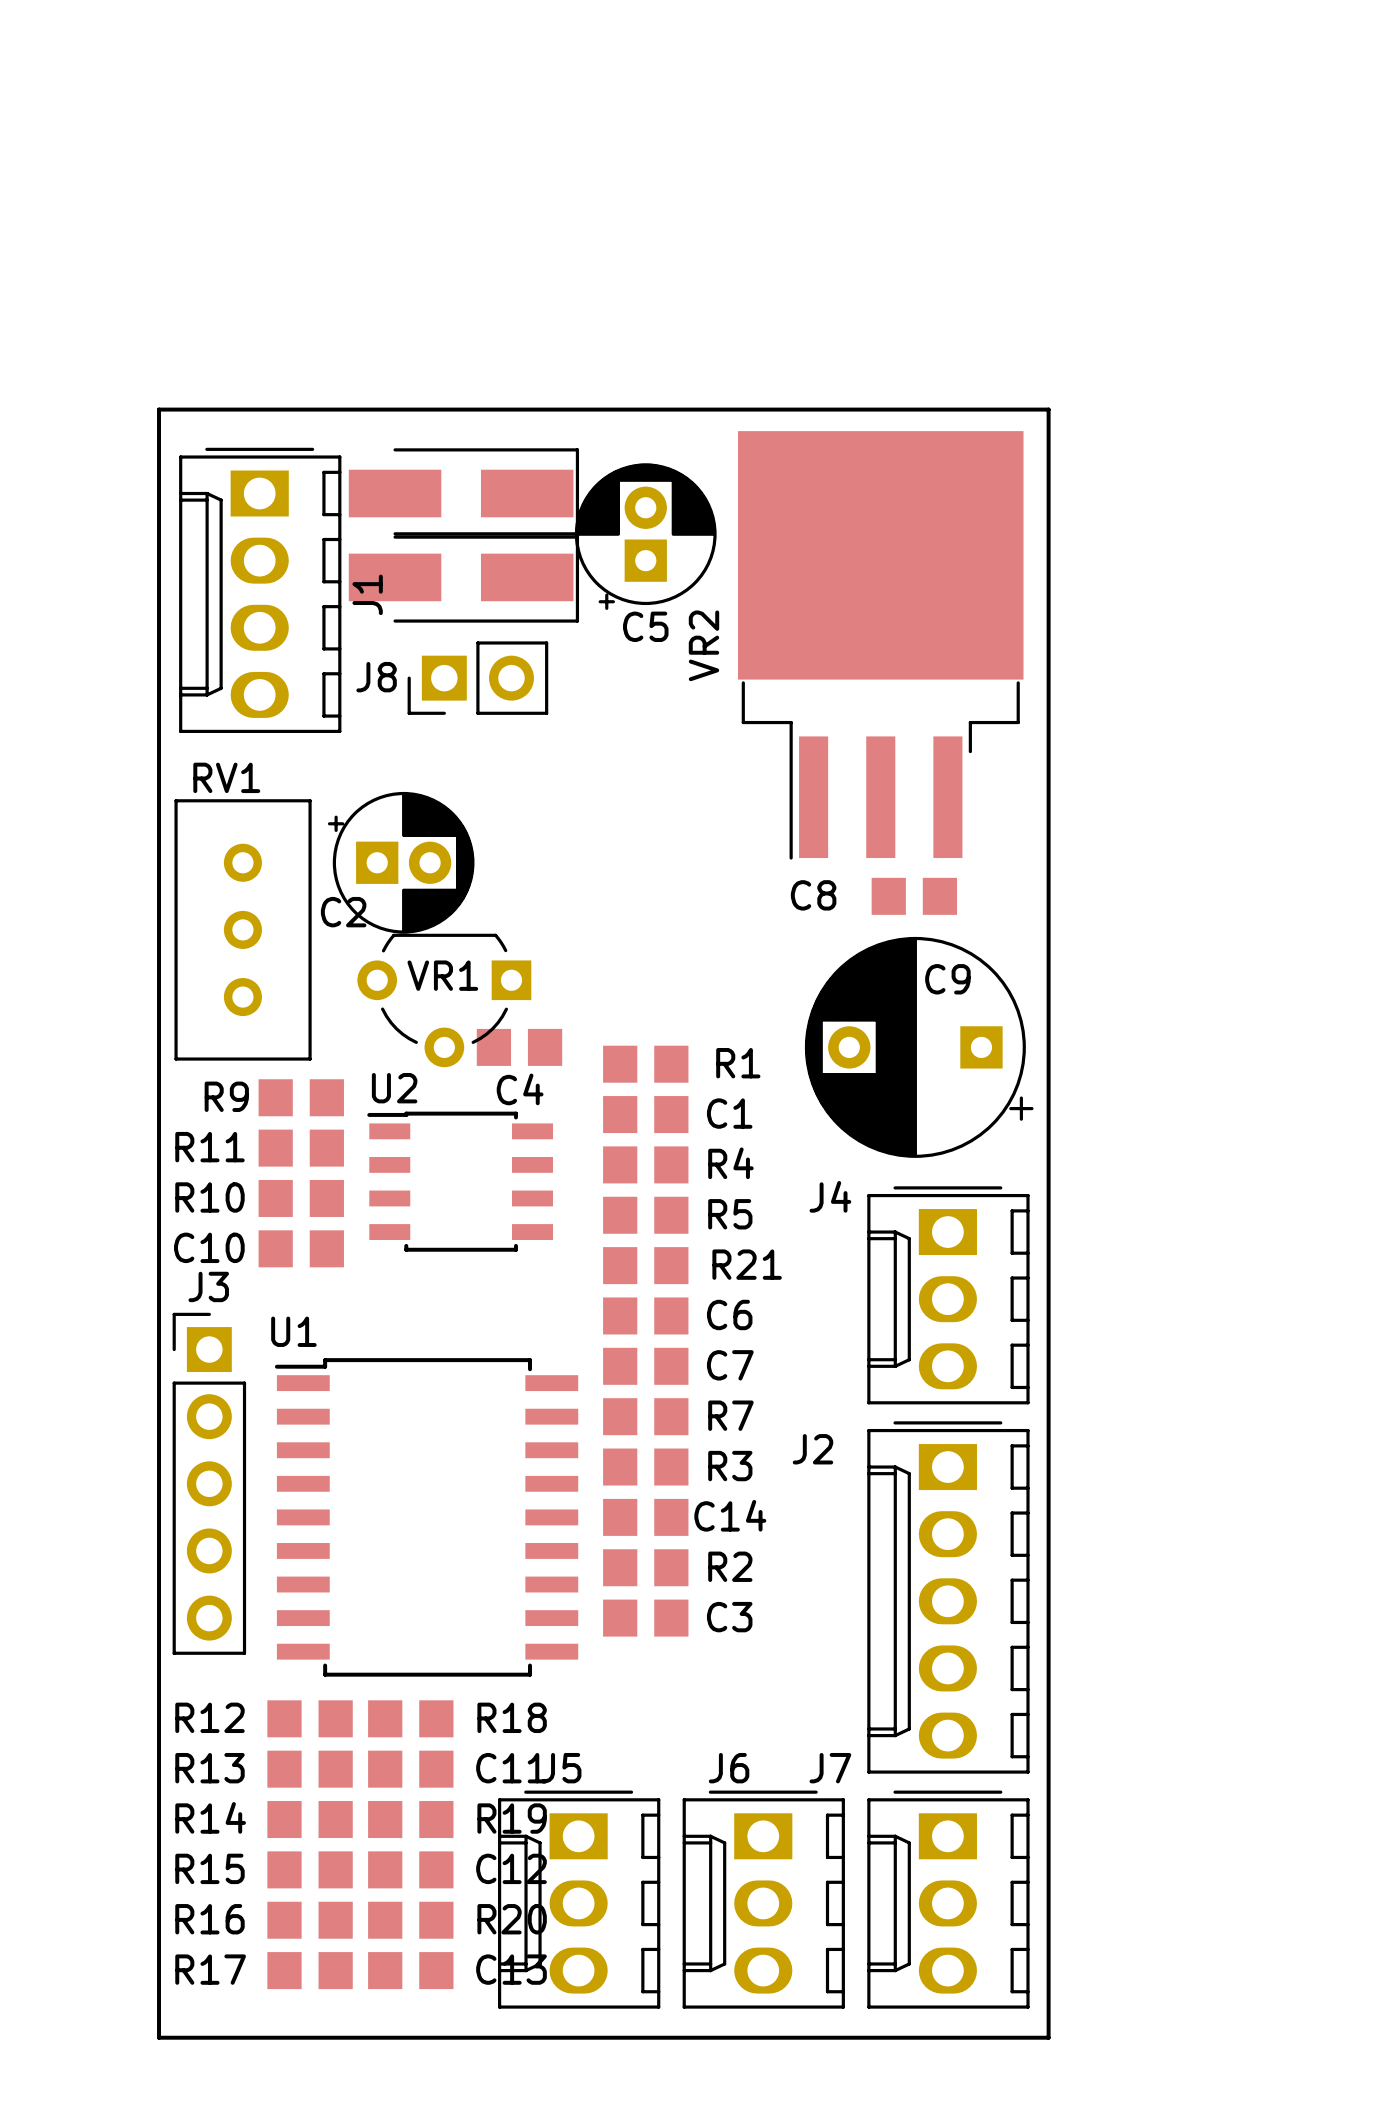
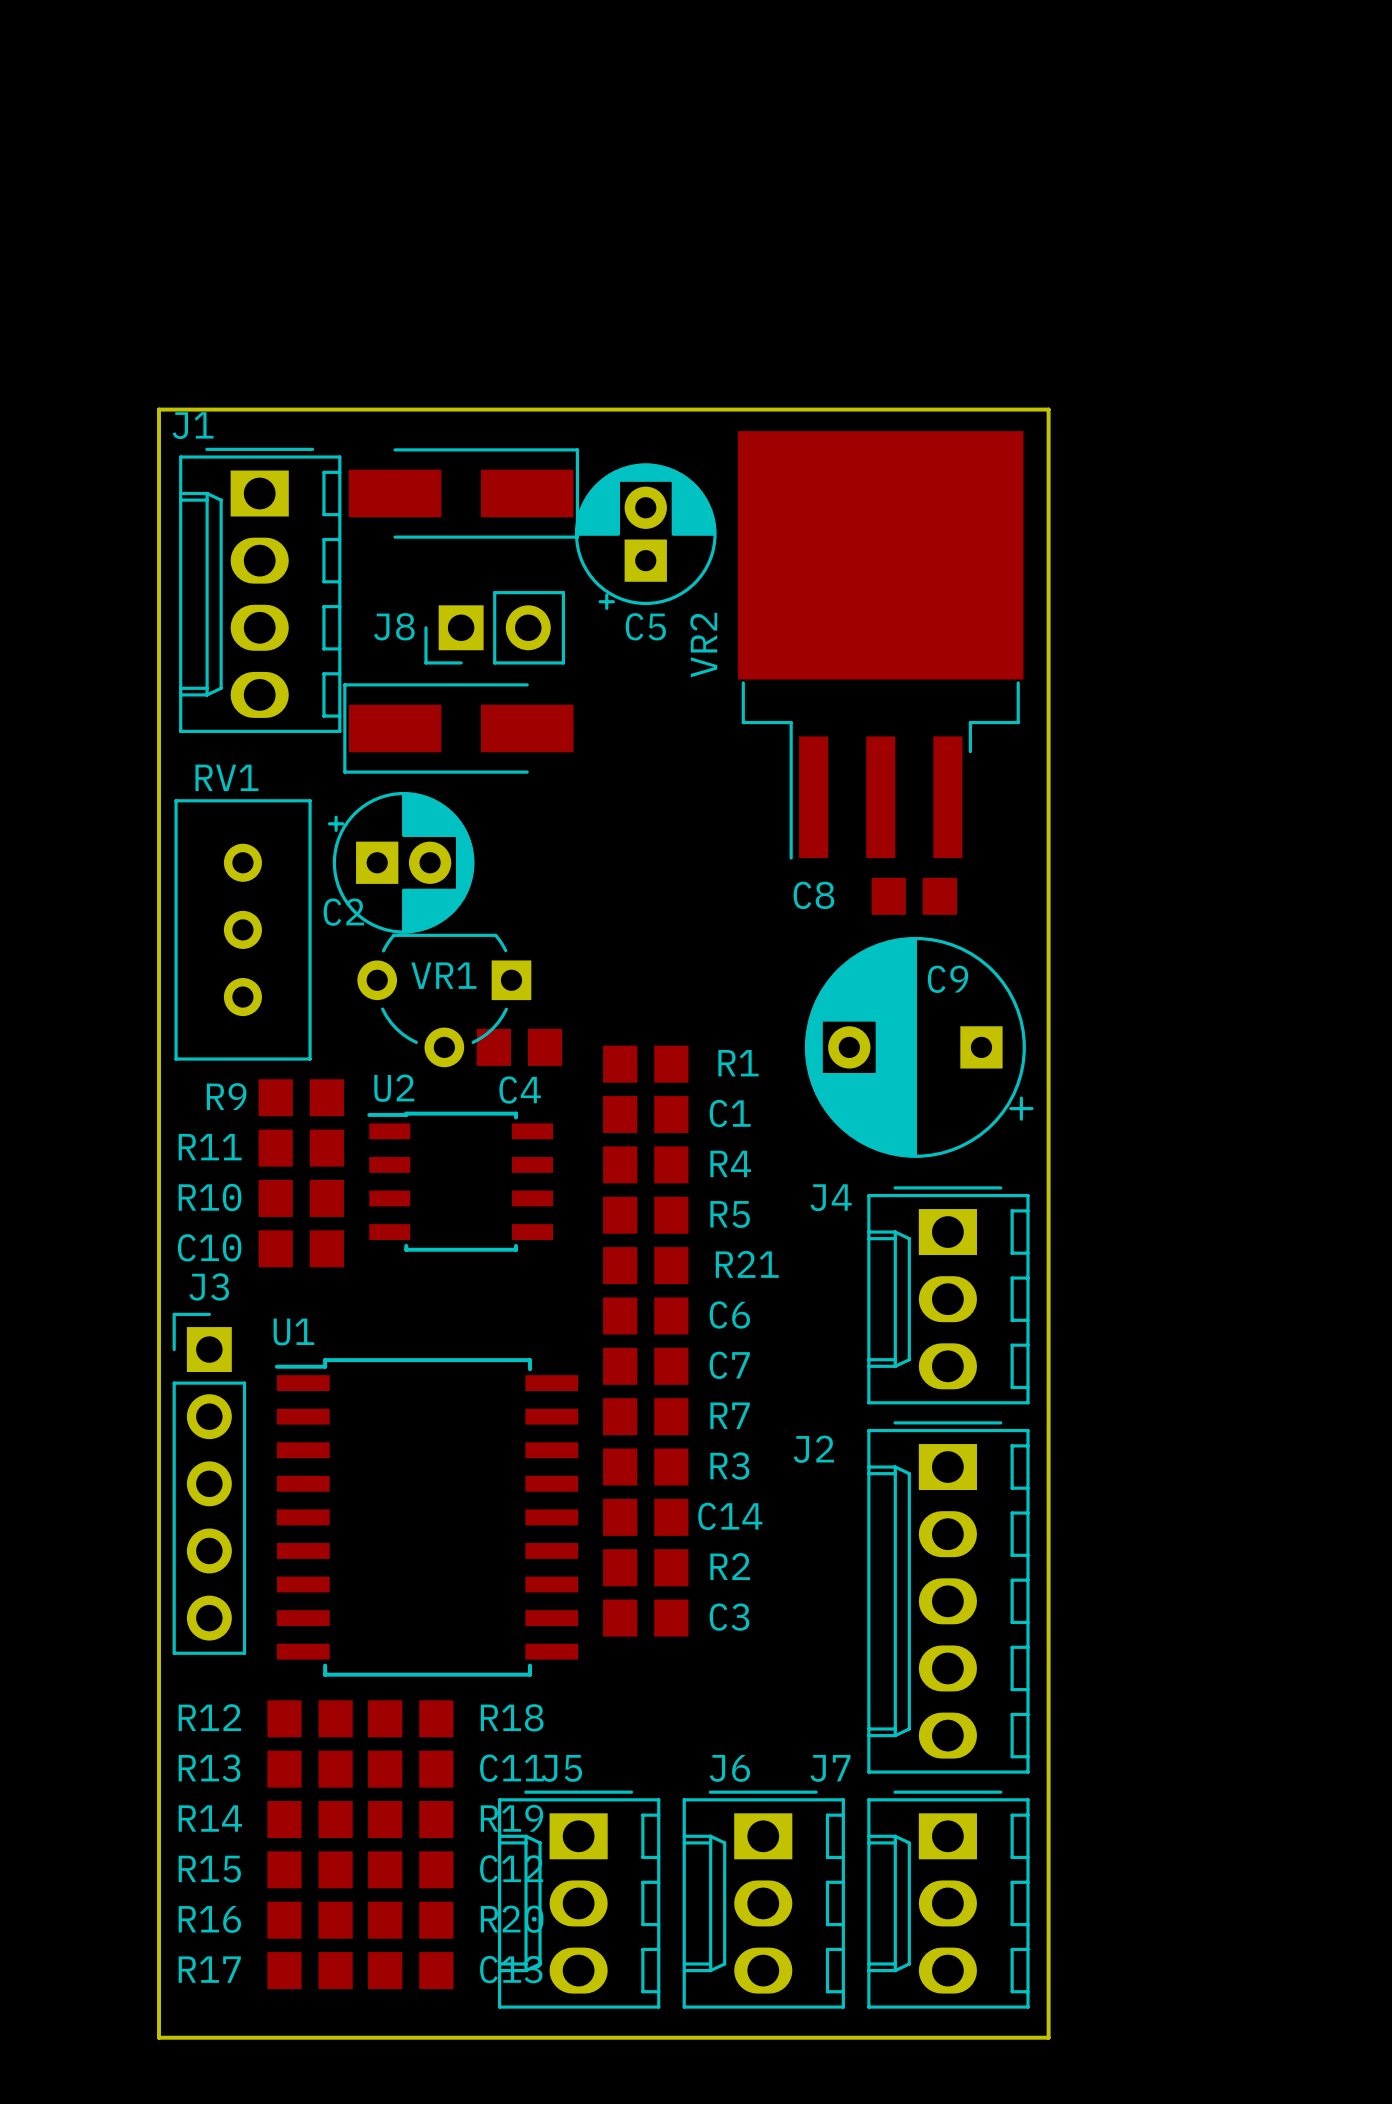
part rotation: 0° (463, 577) -> 180° (458, 728)
part position: (463, 577) -> (458, 728)
J1 name rotation: 0° (367, 594) -> 90° clockwise (193, 425)
J1 name position: J1 (367, 594) -> J1 (193, 425)
J8 position: (477, 678) -> (494, 627)

